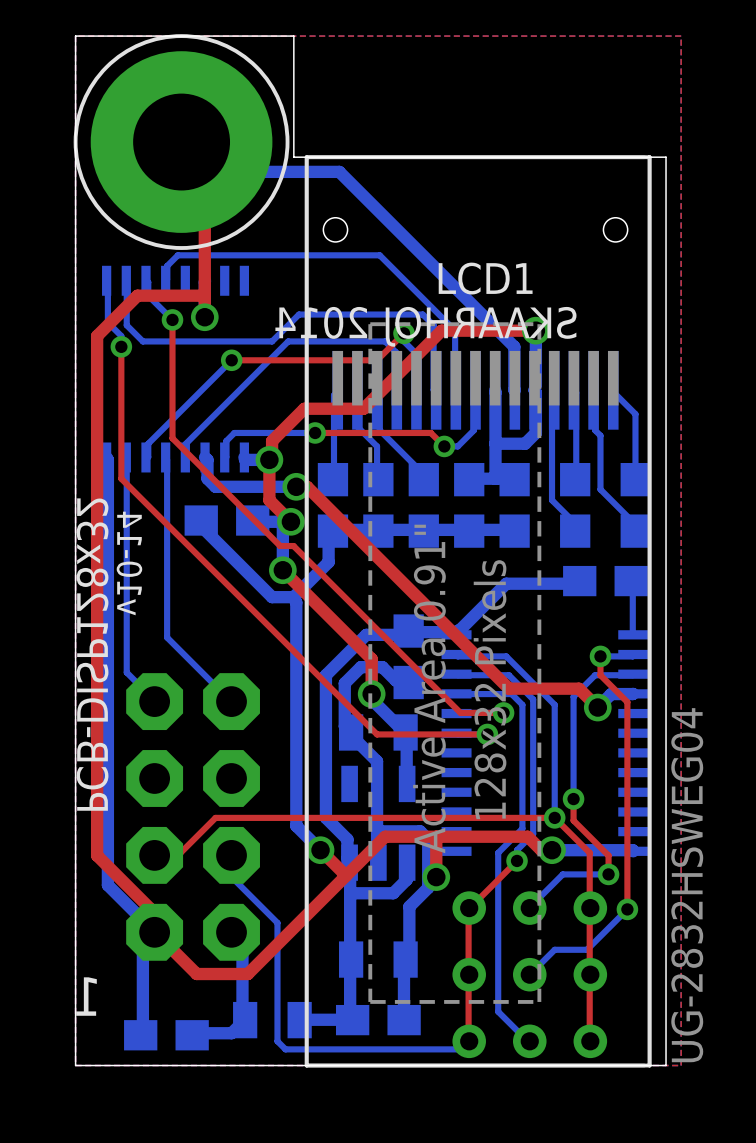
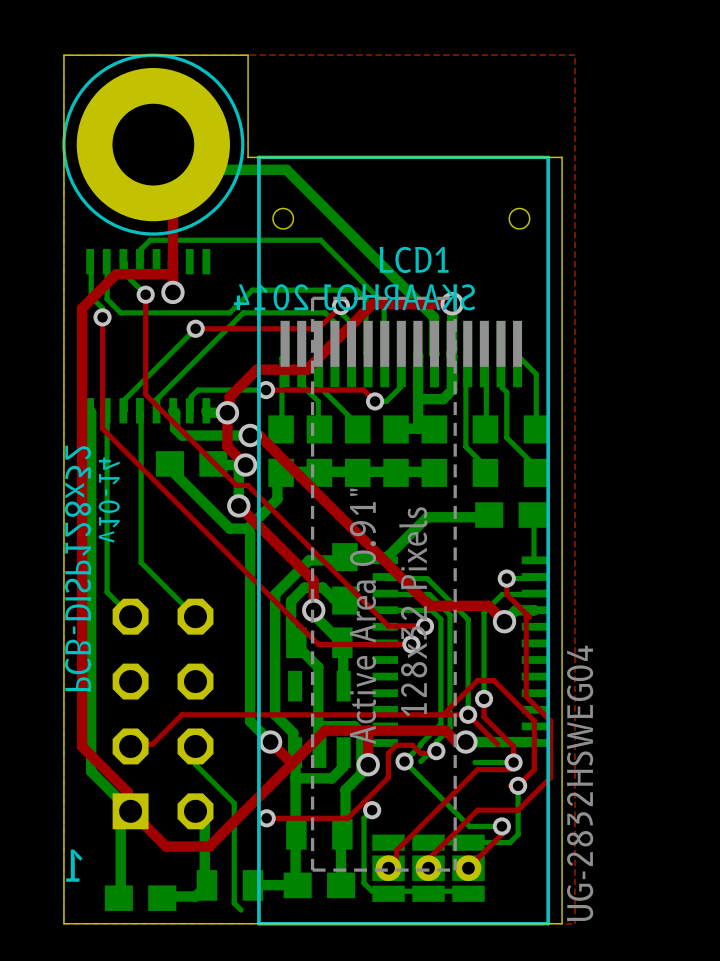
part footprint: [126, 673, 260, 961] -> [112, 598, 214, 830]
top track: none -> (527, 614) (526, 696) (550, 720) (550, 777) (518, 810) (477, 810) (428, 858) (428, 868)
top track: (627, 702) (627, 909) -> none
top track: none -> (445, 714) (477, 680) (493, 680) (534, 720) (534, 769) (518, 785) (510, 785)
bottom track: (498, 852) (498, 1011) (529, 1041) -> (420, 744) (404, 761) (469, 826) (501, 826)
top track: (589, 852) (590, 1041) -> none
bottom track: none -> (436, 751) (428, 753) (420, 761)
top track: (517, 860) (468, 909) (469, 1041) -> (436, 751) (420, 753) (412, 745) (396, 745) (388, 753) (388, 777) (347, 818) (266, 818)
via: none -> (404, 761)
bottom track: (562, 874) (529, 908) -> none
top track: none -> (513, 762) (510, 769) (477, 769) (396, 850) (396, 866) (388, 868)
bottom track: none -> (518, 785) (518, 834) (510, 842) (428, 842)
bottom track: (627, 909) (587, 949) (554, 949) (529, 974) -> none
via position: (627, 909) -> (518, 785)
bottom track: none -> (372, 810) (364, 818) (364, 883) (372, 891) (388, 891) (388, 893) (396, 891) (420, 891) (428, 893) (428, 891) (461, 891) (468, 893)
via: none -> (372, 810)
via: none -> (266, 818)
top track: none -> (501, 826) (501, 834) (468, 868)
via: none -> (501, 826)
part: (529, 974) -> none
part: none -> (428, 868)
bottom track: (469, 1041) (463, 1049) (285, 1049) -> none

